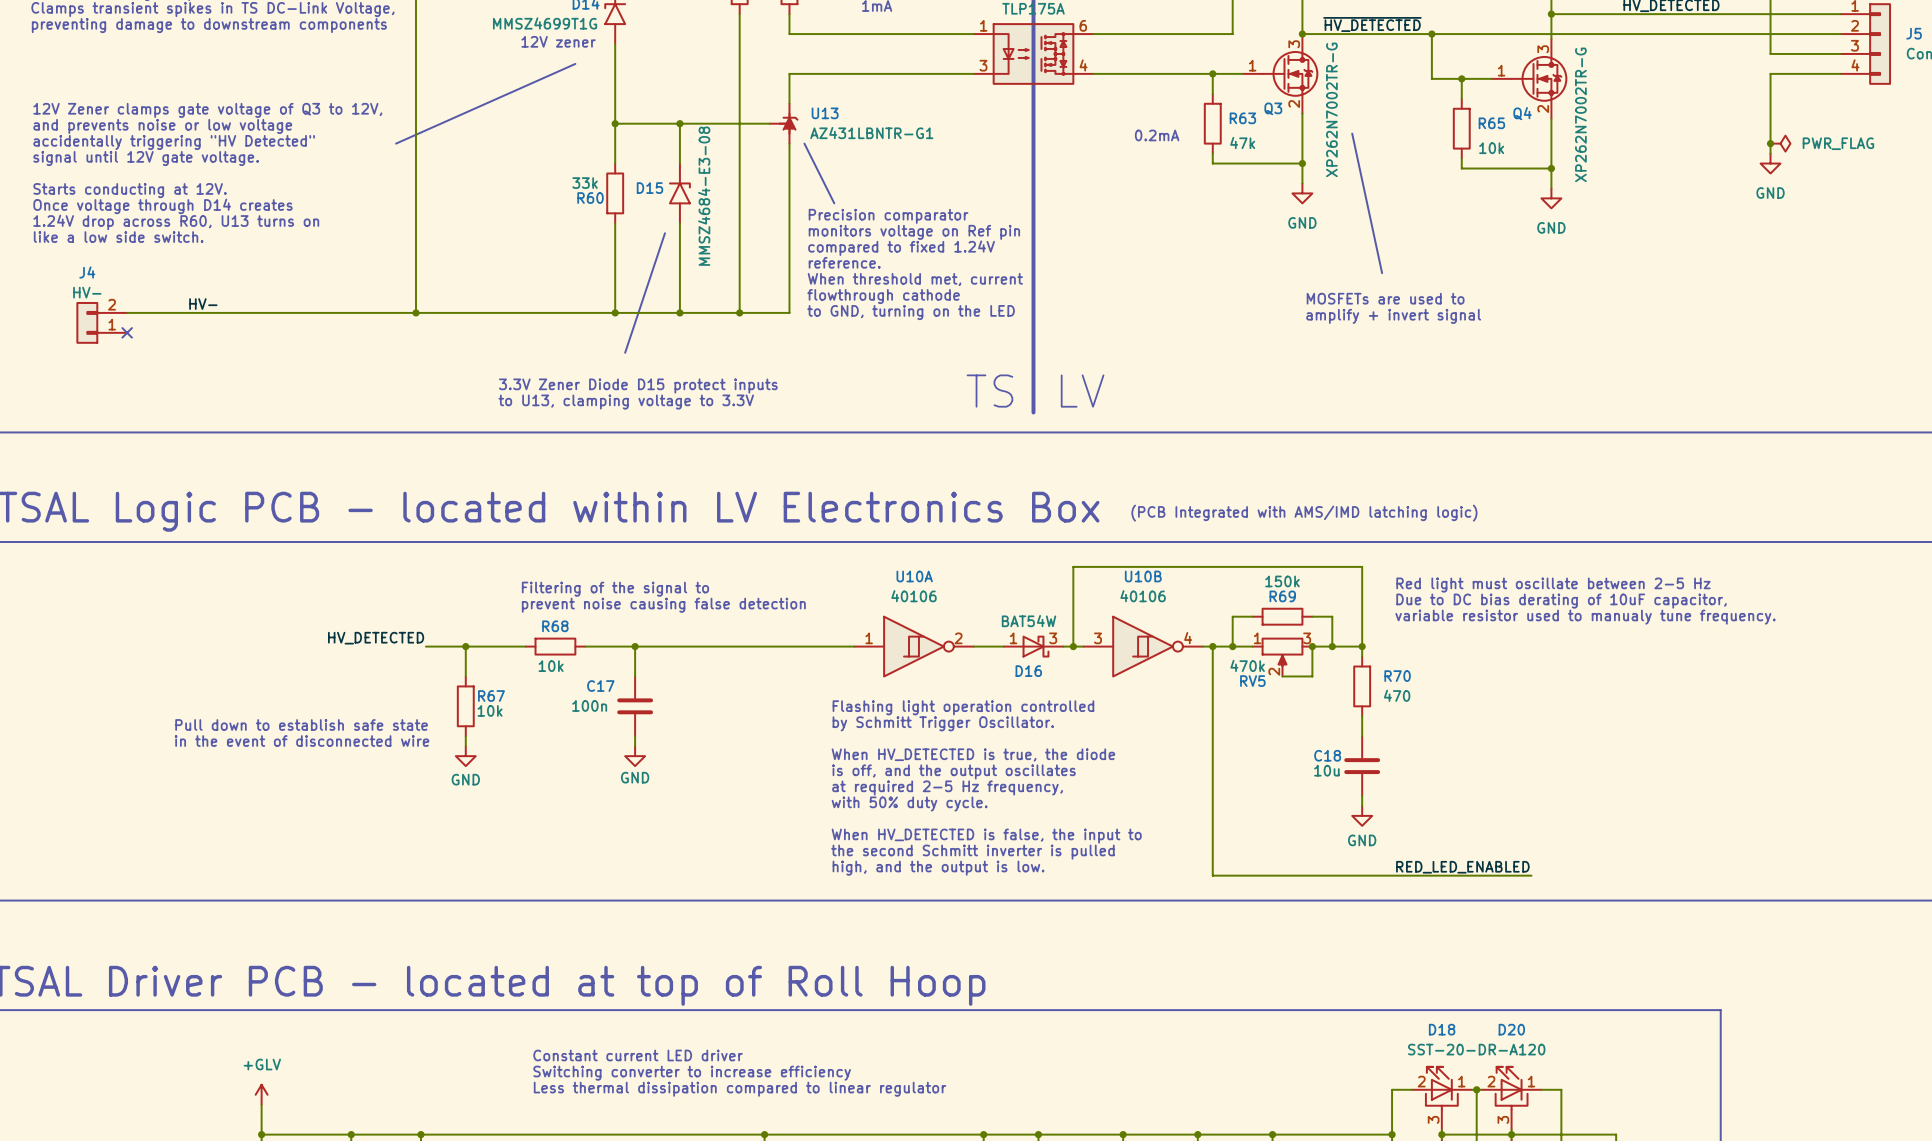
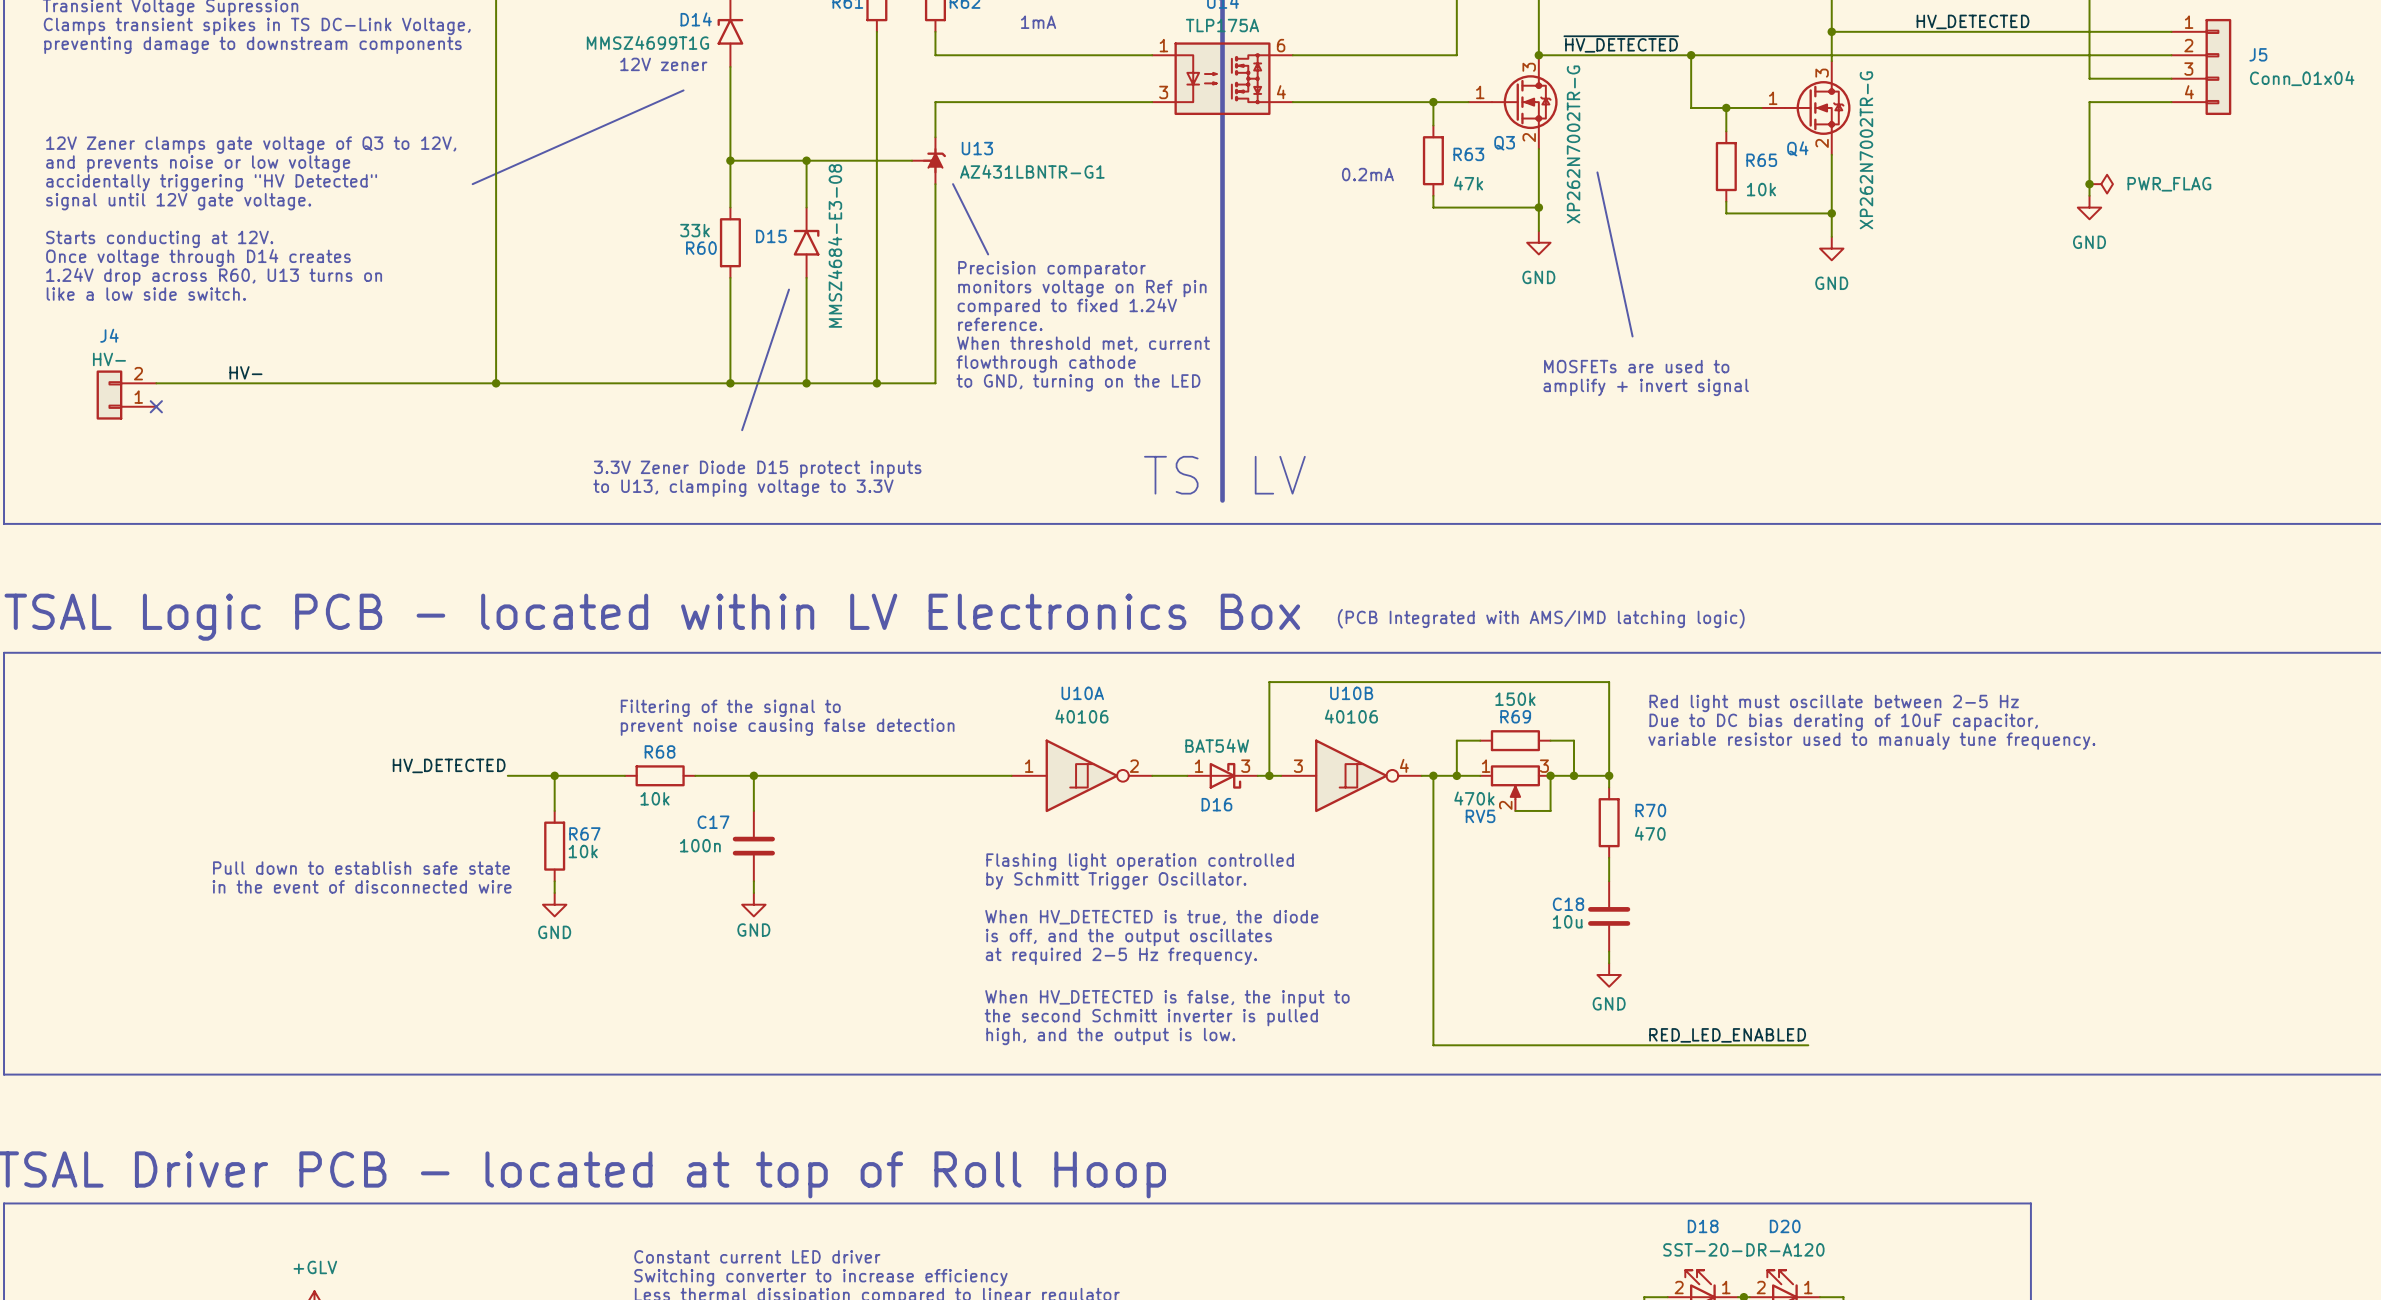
text: Flashing light operation controlled (963, 707) -> none
text: by Schmitt Trigger Oscillator. (943, 723) -> Flashing light operation controlled (1140, 862)
text: none -> by Schmitt Trigger Oscillator. (1116, 880)
text: When HV_DETECTED is true, the diode (973, 754) -> none
text: is off, and the output oscillates (953, 771) -> When HV_DETECTED is true, the diode (1151, 917)
text: at required 2-5 Hz frequency, (947, 787) -> is off, and the output oscillates (1128, 937)
text: with 50% duty cycle. (909, 804) -> at required 2-5 Hz frequency. (1121, 956)

